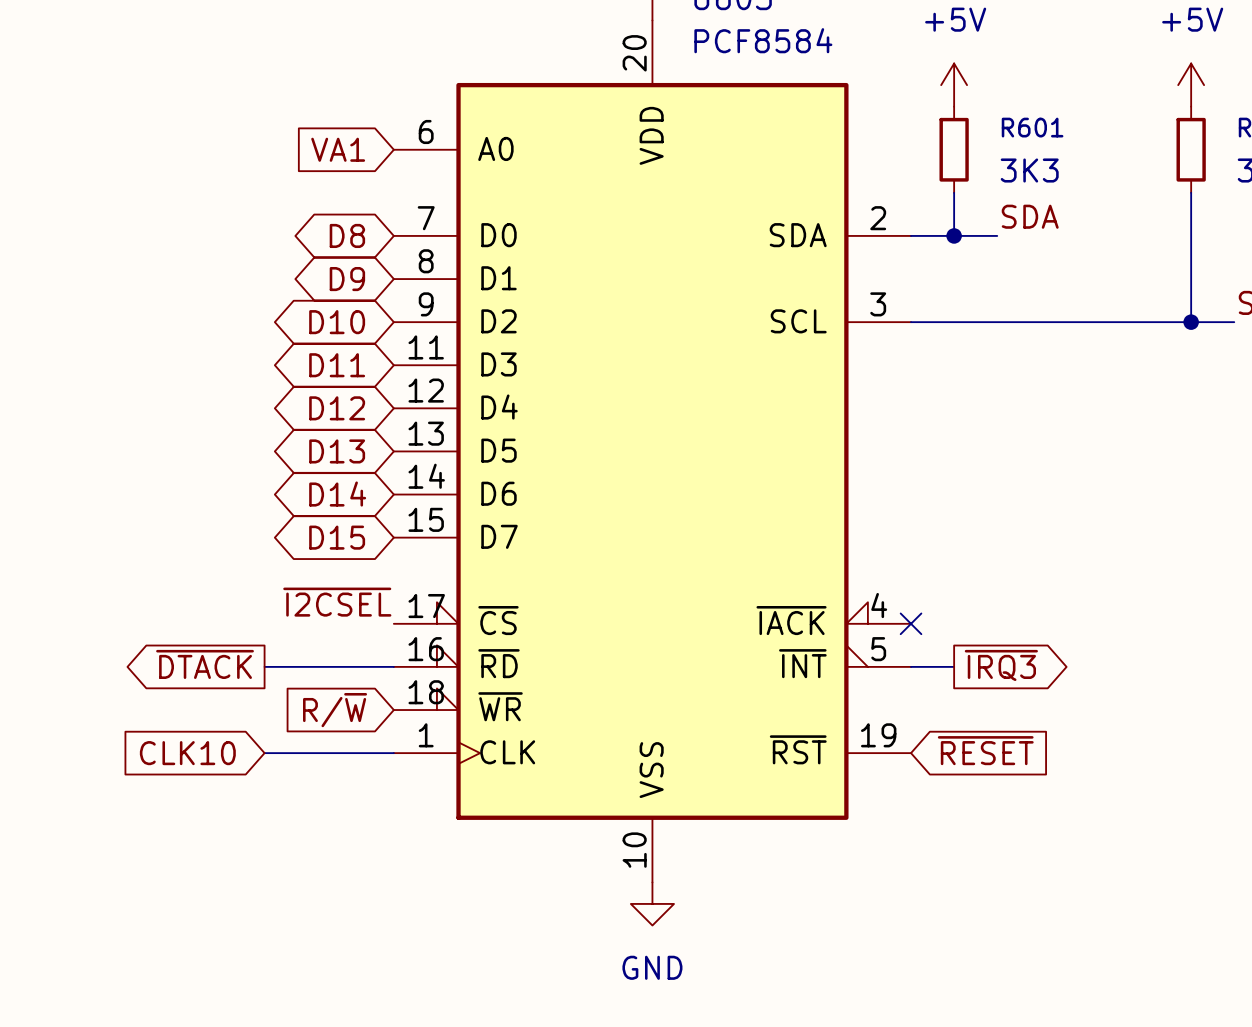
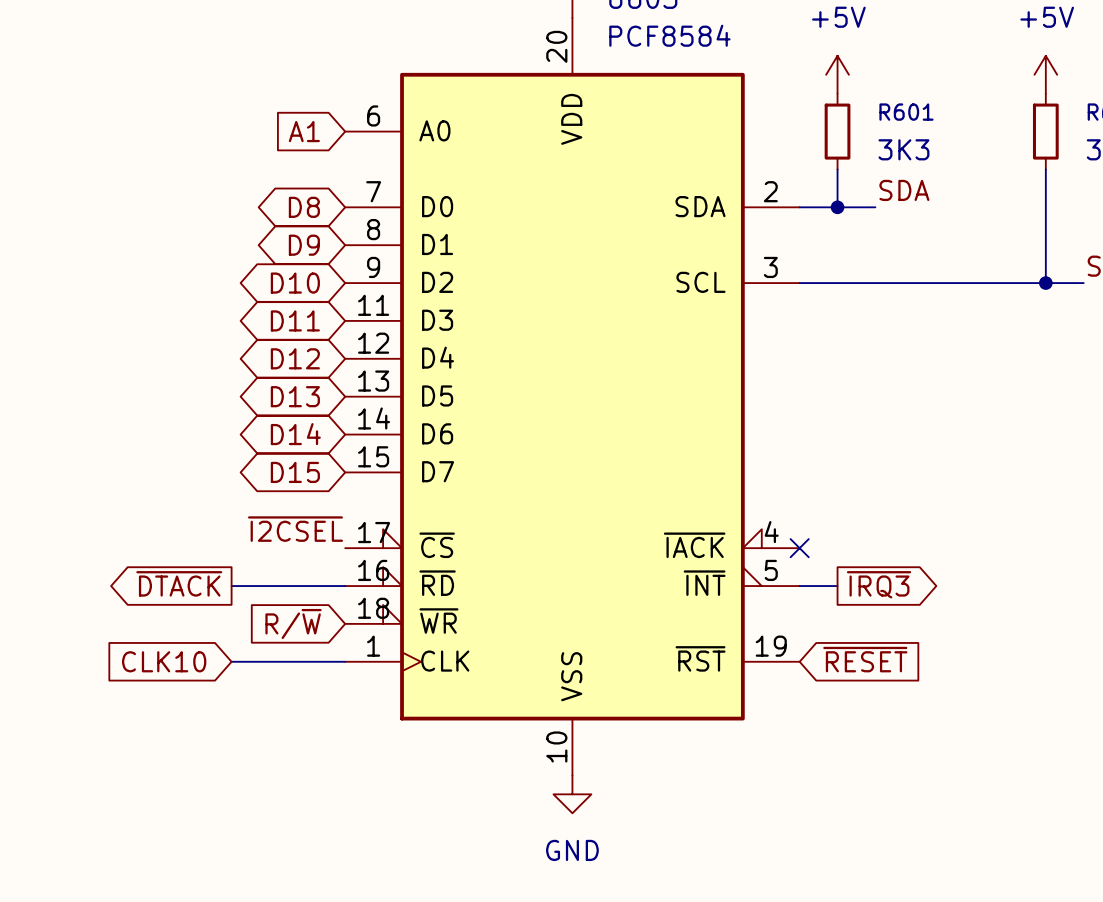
global label: VA1 (338, 149) -> A1 (304, 131)

